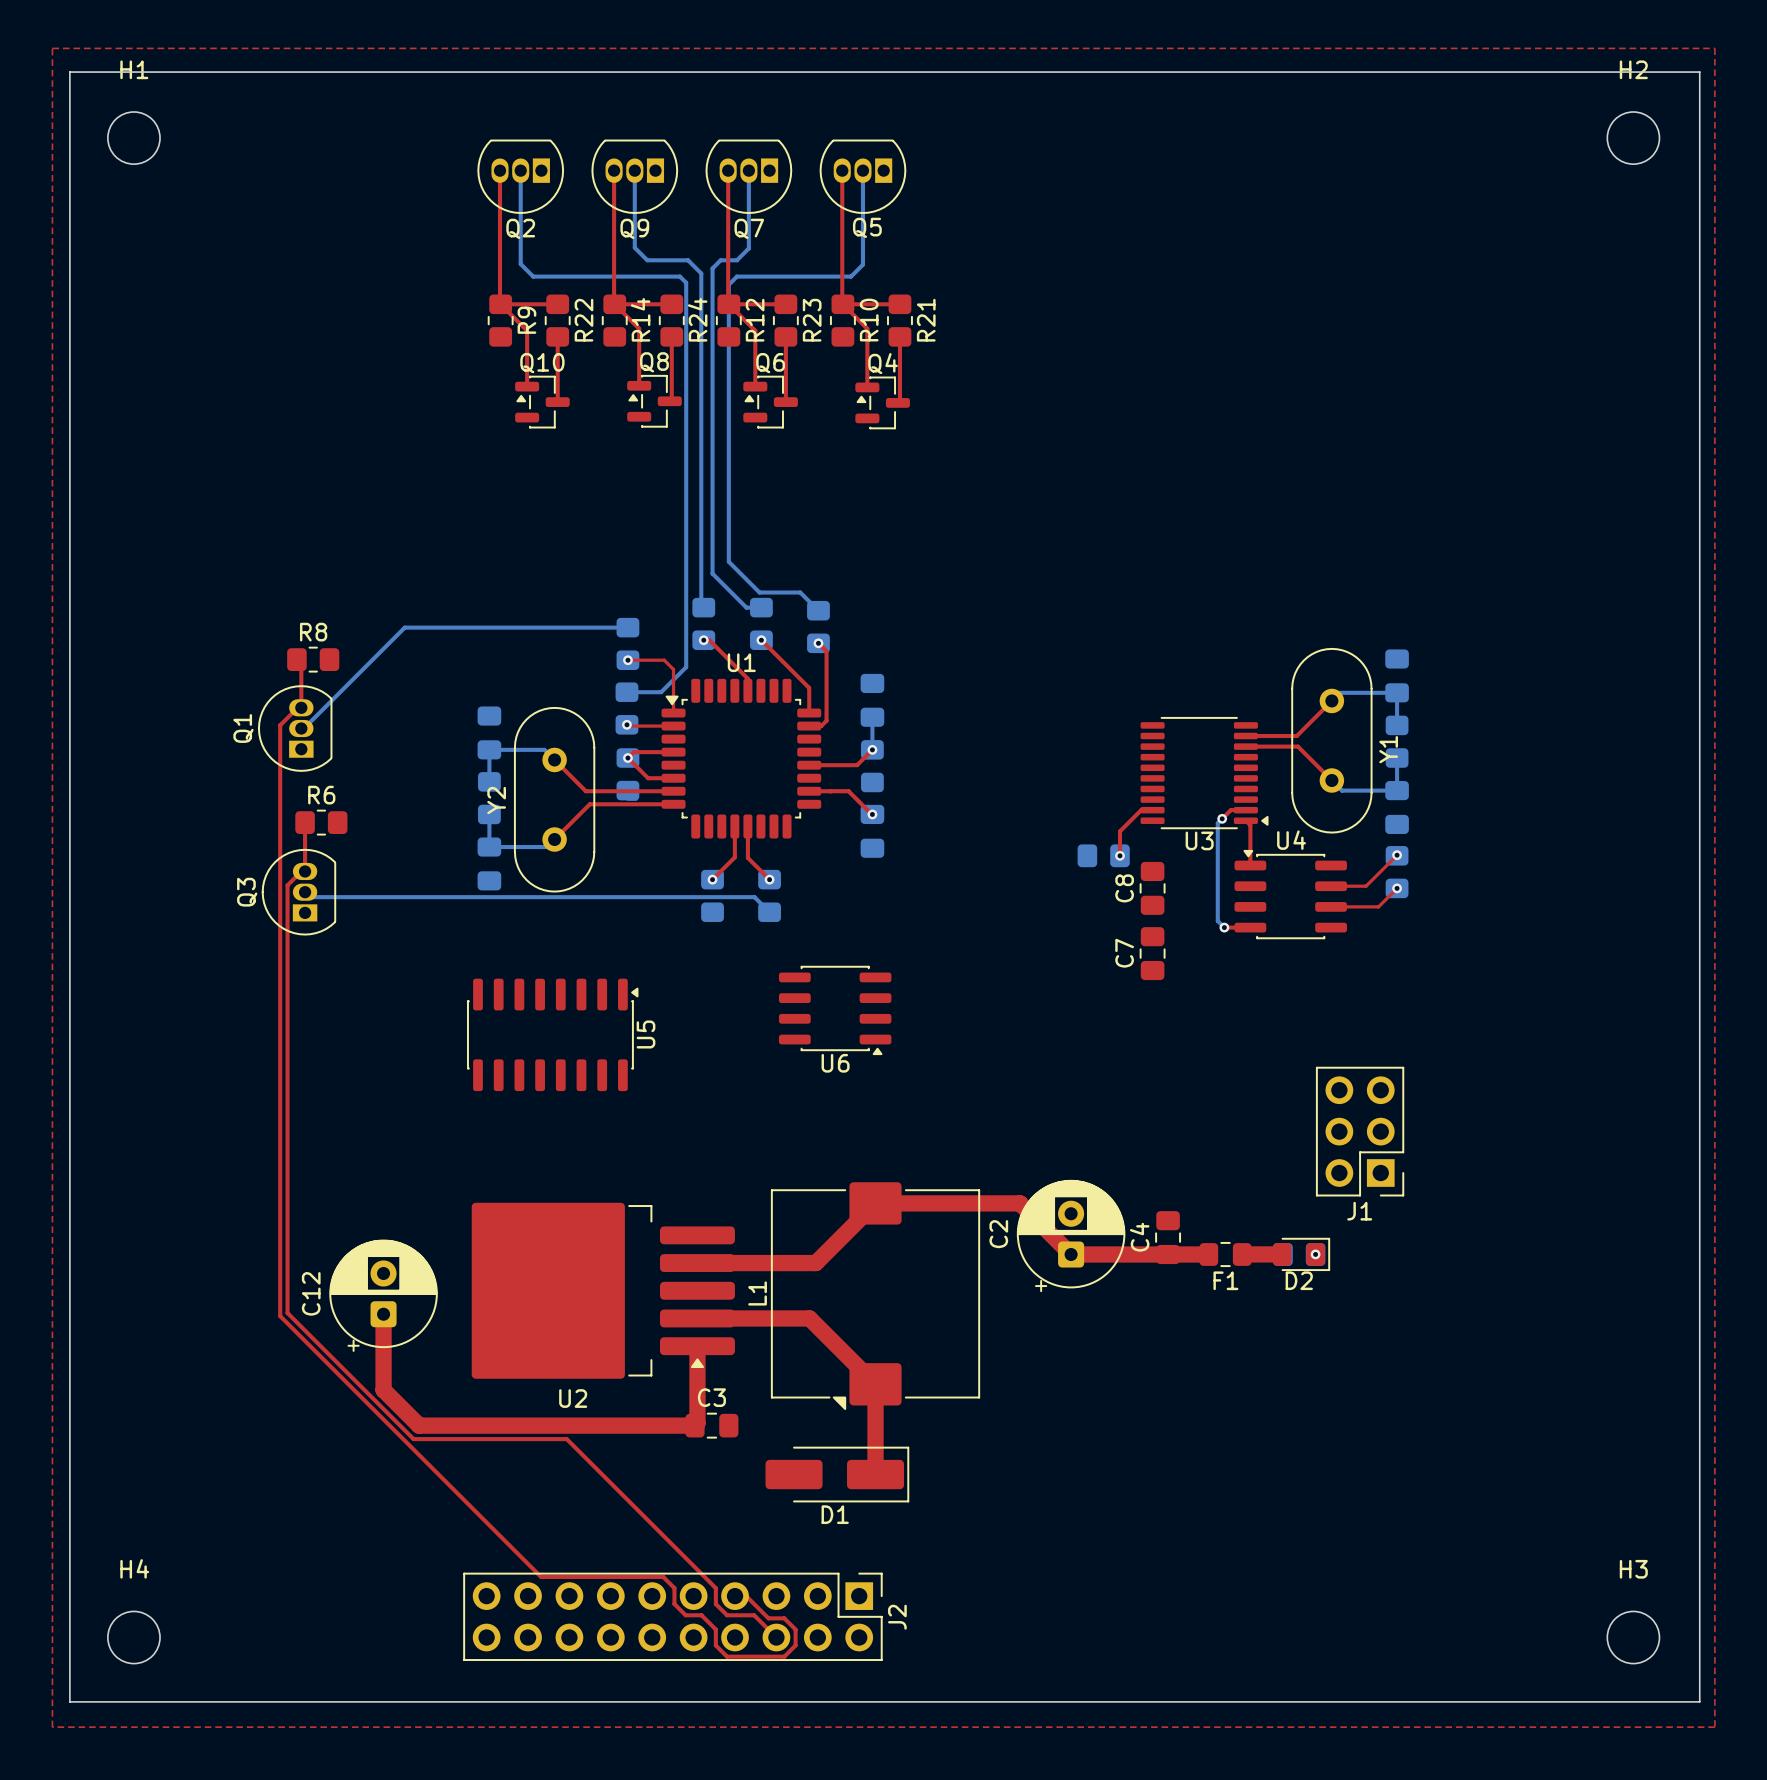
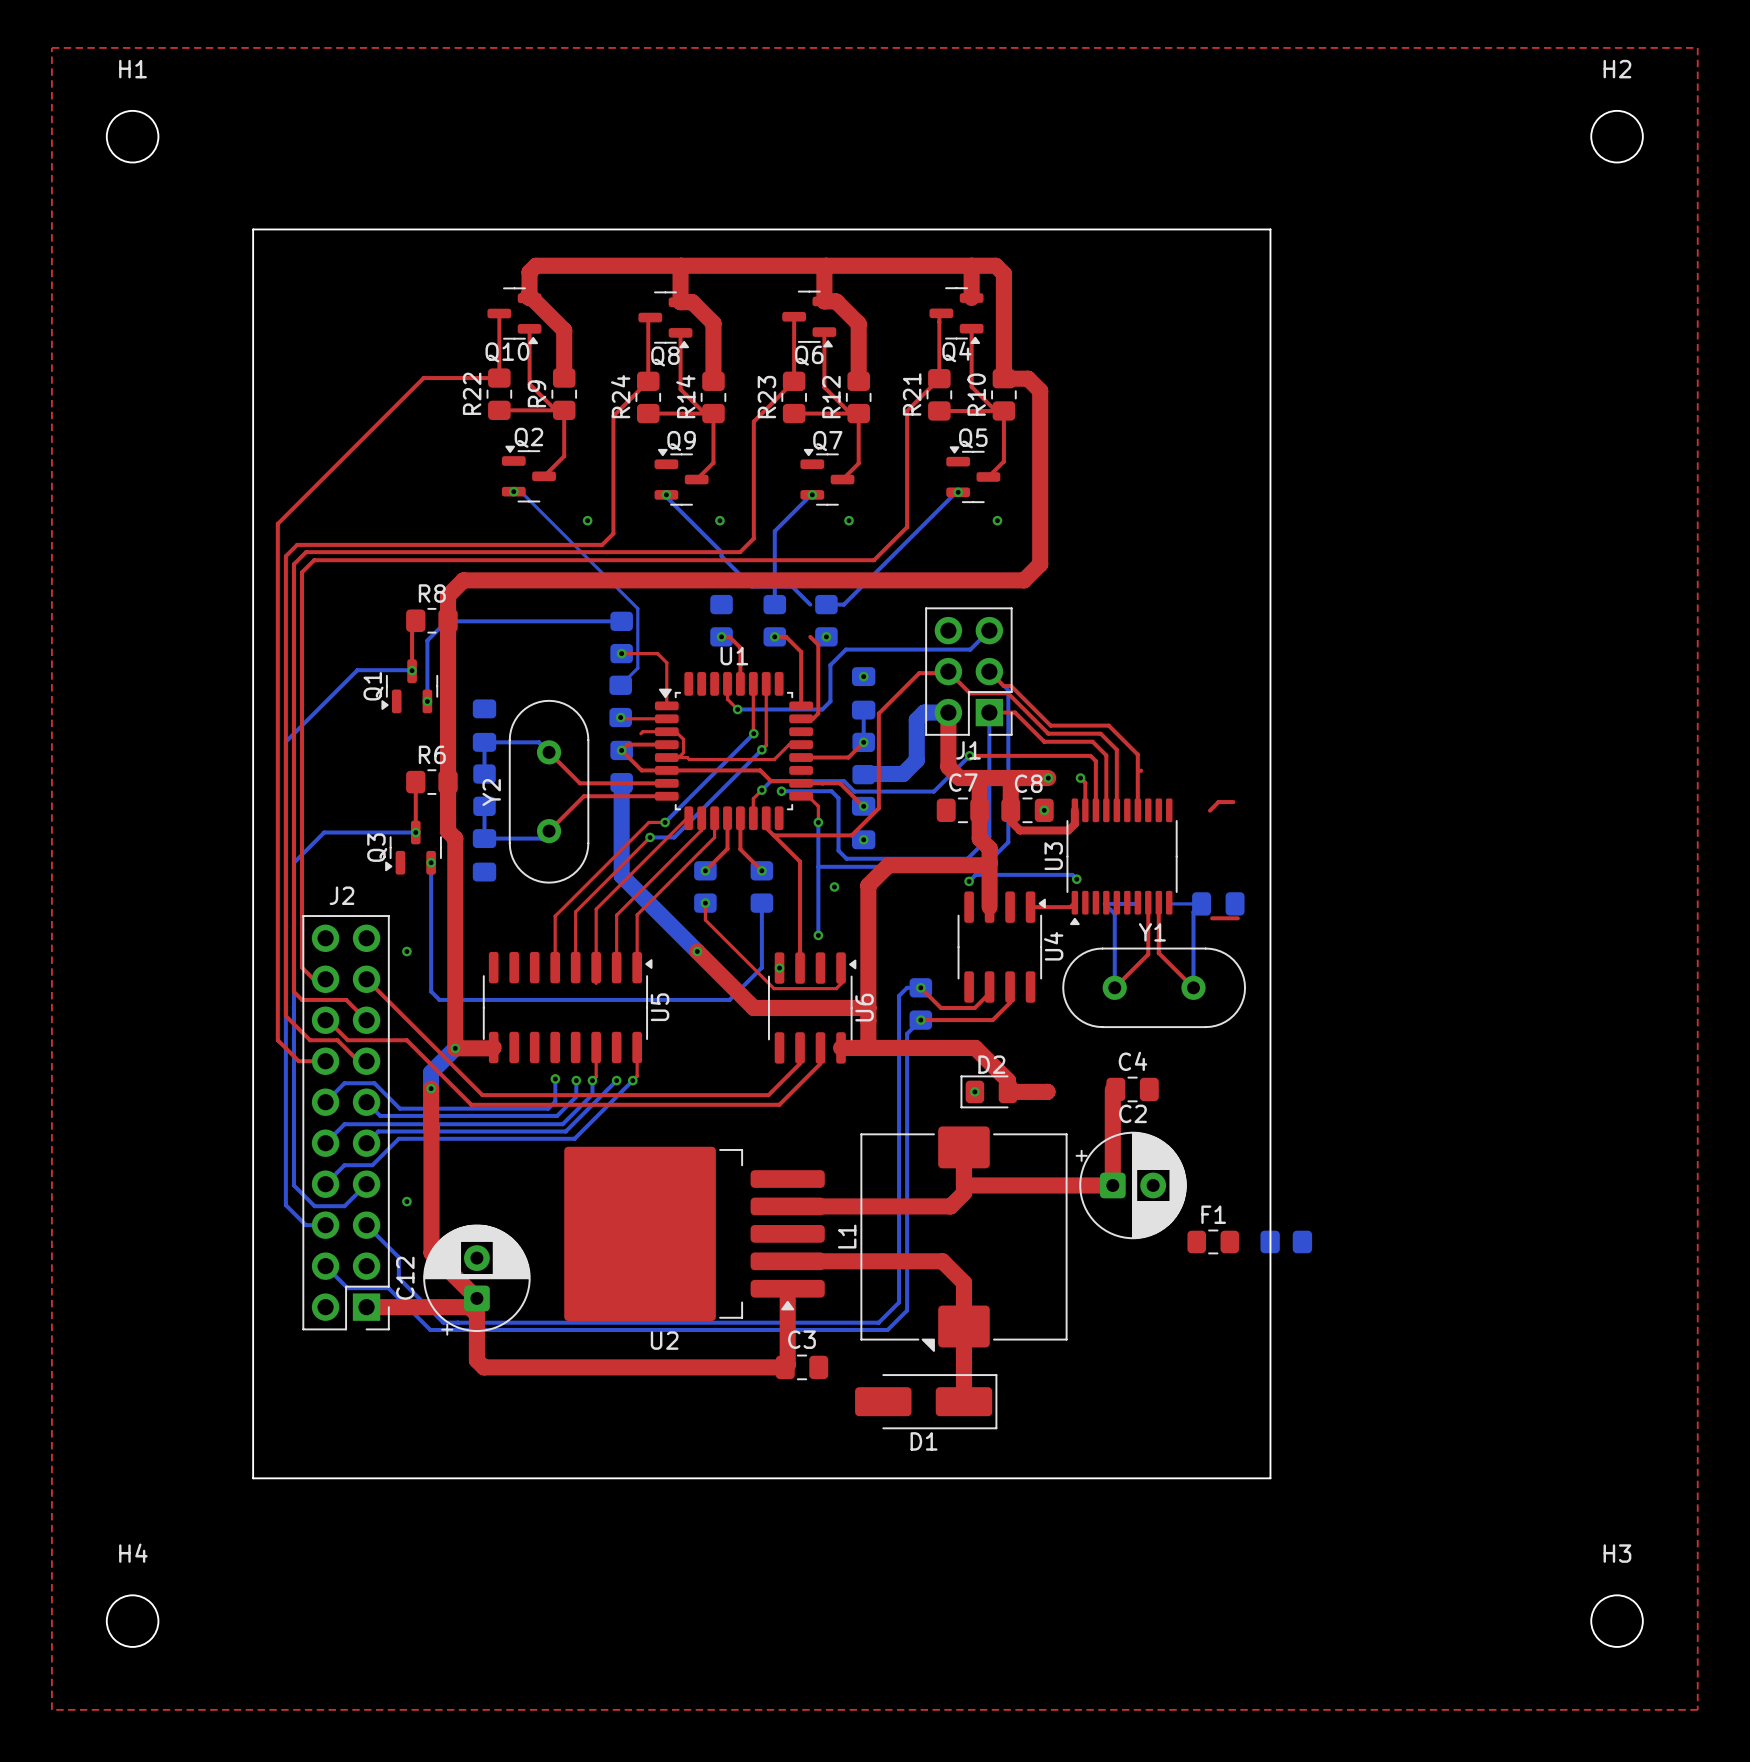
board edge: (69, 72) (1699, 72) (1699, 1701) (69, 1701) (69, 72) -> none
Q2 footprint: [477, 139, 565, 215] -> [501, 445, 556, 503]
Q9 footprint: [591, 139, 679, 215] -> [654, 448, 709, 506]
Q7 footprint: [705, 139, 793, 215] -> [800, 448, 855, 506]
Q5 footprint: [819, 139, 907, 215] -> [946, 446, 1001, 504]
top track: (500, 170) (500, 303) (527, 330) (527, 386) -> none
bottom track: (520, 170) (520, 264) (533, 276) (679, 276) (686, 282) (686, 667) (661, 692) (626, 692) -> (513, 491) (520, 491) (637, 608) (637, 668) (620, 685)
top track: (614, 170) (614, 303) (639, 328) (639, 385) -> none
bottom track: (634, 170) (634, 247) (647, 260) (688, 260) (701, 273) (701, 605) (703, 607) -> none
top track: (728, 170) (728, 303) (755, 330) (755, 386) -> none
bottom track: (748, 170) (748, 248) (736, 260) (720, 260) (712, 268) (712, 573) (746, 607) (761, 607) -> none
top track: (842, 170) (842, 303) (867, 328) -> (826, 265) (824, 267) (824, 301) (836, 301) (858, 325)
bottom track: (862, 170) (862, 264) (851, 276) (736, 276) (728, 284) (728, 557) -> (665, 495) (721, 552)
Q5 name position: Q5 (867, 227) -> Q5 (973, 438)
Q2 name position: Q2 (520, 228) -> Q2 (528, 437)
Q9 name position: Q9 (634, 228) -> Q9 (681, 440)
Q7 name position: Q7 (749, 228) -> Q7 (827, 440)
board edge: none -> (253, 229) (1270, 229) (1270, 1478) (253, 1478) (253, 229)
top track: none -> (681, 265) (680, 302) (692, 302) (713, 323) (713, 381)
top track: none -> (971, 265) (971, 298)
top track: (500, 304) (557, 304) -> (499, 410) (555, 410)
top track: (614, 304) (671, 304) -> none
top track: (728, 304) (785, 304) -> none
top track: (842, 304) (899, 304) -> (939, 410) (995, 410)
top track: none -> (499, 313) (499, 378) (423, 378) (277, 523) (277, 1040) (298, 1061) (325, 1061)
top track: none -> (941, 313) (939, 315) (939, 378) (907, 410) (907, 527) (874, 560) (314, 560) (302, 572) (302, 814)
R14 name position: R14 (640, 319) -> R14 (685, 396)
R24 name position: R24 (697, 319) -> R24 (620, 396)
top track: none -> (794, 316) (794, 381) (753, 421) (753, 538) (740, 552) (306, 552) (293, 564) (293, 991) (302, 999) (346, 999) (366, 1020)
R9 position: (500, 320) -> (564, 394)
R9 name position: R9 (526, 320) -> R9 (536, 393)
R22 position: (557, 320) -> (499, 394)
R22 name position: R22 (583, 320) -> R22 (472, 393)
R14 position: (614, 320) -> (713, 397)
top track: none -> (650, 317) (648, 319) (648, 381) (613, 416) (613, 533) (602, 544) (297, 544) (285, 556) (285, 1016) (310, 1040) (337, 1040) (358, 1061)
R24 position: (671, 320) -> (648, 397)
R12 position: (728, 320) -> (858, 397)
R12 name position: R12 (755, 320) -> R12 (831, 397)
R23 position: (785, 320) -> (794, 397)
R23 name position: R23 (812, 320) -> R23 (766, 397)
R10 position: (842, 320) -> (1003, 394)
R10 name position: R10 (869, 320) -> R10 (976, 394)
R21 position: (899, 320) -> (939, 394)
R21 name position: R21 (926, 320) -> R21 (912, 394)
top track width: thin (867, 328) (867, 385) -> thick (858, 325) (858, 381)
top track: none -> (529, 328) (529, 384) (556, 410)
top track: none -> (971, 328) (971, 386) (996, 411)
top track: none -> (824, 332) (824, 387) (850, 413) (794, 413)
top track: (557, 336) (557, 402) -> none
top track: (671, 336) (671, 399) (669, 401) -> none
top track: none -> (680, 332) (680, 389) (704, 413) (648, 413)
top track: (785, 336) (785, 402) -> none
top track: (899, 336) (899, 400) (897, 402) -> none
Q8 name position: Q8 (654, 362) -> Q8 (665, 356)
Q10 name position: Q10 (542, 363) -> Q10 (507, 352)
Q6 name position: Q6 (770, 363) -> Q6 (809, 355)
Q4 name position: Q4 (883, 363) -> Q4 (956, 351)
Q8 footprint: [627, 374, 682, 428] -> [638, 291, 693, 349]
Q10 footprint: [515, 375, 570, 429] -> [487, 287, 542, 345]
Q6 footprint: [743, 375, 798, 429] -> [782, 290, 837, 348]
Q4 footprint: [855, 376, 910, 430] -> [929, 287, 984, 345]
top track: none -> (564, 378) (564, 330) (532, 298) (527, 296) (529, 294) (529, 272) (535, 265) (995, 265) (1003, 273) (1003, 378) (1028, 378) (1040, 390) (1040, 564) (1024, 580) (463, 580) (448, 595) (448, 831) (455, 838) (455, 1048) (493, 1047)
top track: none -> (564, 410) (564, 456) (544, 476)
top track: none -> (1003, 410) (1003, 461) (988, 476)
top track: none -> (713, 413) (713, 462) (696, 479)
top track: none -> (858, 413) (858, 463) (842, 479)
via: none -> (513, 491)
bottom track: none -> (958, 492) (843, 604) (826, 604)
via: none -> (958, 492)
via: none -> (666, 494)
via: none -> (812, 494)
bottom track: none -> (810, 495) (774, 531) (774, 604)
via: none -> (587, 520)
via: none -> (719, 520)
via: none -> (849, 520)
via: none -> (997, 520)
part: (703, 623) -> none
part: (761, 623) -> none
top track: none -> (415, 620) (412, 624) (412, 676)
bottom track: (451, 627) (404, 627) (303, 728) (301, 728) -> (446, 621) (427, 640) (427, 701)
part: none -> (721, 620)
part: none -> (774, 620)
part position: (818, 627) -> (826, 620)
bottom track: none -> (989, 630) (970, 649) (845, 649) (830, 665) (830, 701) (822, 709) (737, 709)
top track: (703, 640) (709, 640) (747, 678) -> (721, 636) (729, 636) (740, 647) (740, 672)
via: (703, 640) -> none
top track: (761, 640) (809, 688) -> (774, 636) (786, 636) (801, 651) (801, 681)
via: (761, 640) -> none
via: none -> (721, 636)
via: none -> (774, 636)
via position: (818, 643) -> (826, 636)
top track: (296, 659) (301, 664) (301, 707) (297, 707) (280, 725) (280, 1316) (541, 1576) (663, 1576) (674, 1588) (674, 1604) (685, 1615) (701, 1615) (715, 1629) (715, 1645) (727, 1656) (784, 1656) (795, 1645) (795, 1629) (784, 1618) (768, 1618) (746, 1596) (735, 1596) -> none
R8 position: (313, 659) -> (431, 620)
part: (1397, 675) -> none
bottom track: none -> (411, 670) (357, 670) (285, 741) (285, 1205) (305, 1225) (325, 1225)
via: none -> (412, 670)
top track: none -> (989, 671) (1003, 686) (1011, 686) (1050, 725) (1108, 725) (1137, 754) (1136, 809)
bottom track: none -> (989, 671) (1008, 690) (1008, 842) (983, 866) (818, 866)
via: none -> (863, 676)
Q1 footprint: [257, 685, 333, 772] -> [381, 659, 439, 714]
top track: none -> (727, 683) (727, 699) (737, 709)
top track: none -> (753, 683) (753, 733)
top track: none -> (766, 683) (766, 745) (761, 749)
top track: (1331, 700) (1296, 736) (1245, 736) -> none
bottom track: (1331, 700) (1340, 692) (1397, 692) (1397, 725) -> none
via: none -> (427, 701)
via: none -> (737, 709)
U3 footprint: [1140, 716, 1269, 830] -> [1066, 798, 1178, 926]
top track: none -> (948, 712) (948, 766) (959, 778) (1048, 778)
bottom track: none -> (948, 712) (924, 712) (916, 719) (916, 760) (903, 774) (863, 774)
top track: none -> (989, 712) (1015, 712) (1044, 741) (1092, 741) (1106, 755) (1106, 810)
bottom track: none -> (989, 712) (989, 836) (967, 858) (846, 858) (838, 850) (838, 798) (831, 791) (781, 791)
Y1 rotation: 0° (1331, 740) -> 90° clockwise (1154, 987)
Y1 position: (1331, 740) -> (1154, 987)
top track: none -> (640, 733) (642, 731) (675, 731) (683, 739) (683, 752) (678, 757)
bottom track: none -> (753, 733) (665, 822)
via: none -> (753, 733)
part: (1397, 741) -> none
top track: (1245, 746) (1297, 746) (1331, 780) -> none
Y1 name position: Y1 (1388, 749) -> Y1 (1152, 932)
top track: none -> (801, 744) (789, 744) (774, 759) (689, 759) (687, 757) (666, 757)
bottom track: none -> (761, 749) (674, 837) (650, 837) (655, 837)
via: none -> (761, 749)
bottom track: (1397, 758) (1397, 790) (1341, 790) (1331, 780) -> none
top track: none -> (969, 755) (1090, 755) (1095, 761) (1095, 810)
bottom track: none -> (969, 755) (933, 791) (854, 791) (844, 781) (770, 781) (761, 790)
via: none -> (969, 755)
top track: none -> (666, 770) (760, 770) (770, 781) (798, 781) (801, 783)
top track: none -> (979, 778) (979, 838) (989, 848) (989, 907)
top track: none -> (1011, 778) (1010, 821) (1020, 830) (1068, 830) (1074, 824) (1074, 810)
via: none -> (1048, 778)
top track: none -> (1080, 778) (1085, 782) (1085, 810)
via: none -> (1080, 778)
top track: none -> (415, 782) (415, 832)
bottom track: none -> (621, 782) (621, 875) (697, 951)
top track: none -> (761, 790) (753, 798) (753, 818)
via: none -> (761, 790)
via: none -> (781, 791)
top track: none -> (801, 796) (808, 796) (818, 806) (818, 822)
part: (1397, 807) -> none
top track: (1152, 810) (1141, 810) (1120, 831) (1120, 855) -> none
via: none -> (1044, 810)
top track: none -> (1116, 810) (1116, 749) (1100, 733) (1048, 733) (1008, 693) (970, 693) (948, 671) (946, 673) (919, 673) (878, 713) (878, 808) (851, 835) (773, 835)
bottom track: (1222, 818) (1217, 823) (1217, 920) (1224, 927) -> none
via: (1222, 818) -> none
top track: (1245, 820) (1250, 825) (1250, 865) -> none
R6 position: (321, 822) -> (431, 782)
top track: none -> (688, 818) (596, 909) (596, 983)
top track: none -> (701, 818) (701, 830) (616, 915) (616, 967)
top track: none -> (714, 818) (714, 837) (637, 914) (637, 967)
top track: none -> (766, 818) (766, 827) (800, 861) (800, 968)
top track: none -> (665, 822) (648, 822) (555, 916) (555, 967)
via: none -> (665, 822)
bottom track: none -> (818, 822) (818, 935)
via: none -> (818, 822)
bottom track: none -> (415, 832) (324, 832) (293, 862) (293, 1185) (314, 1206) (344, 1206) (366, 1184)
via: none -> (415, 832)
U3 name position: U3 (1199, 840) -> U3 (1053, 856)
U4 name position: U4 (1291, 840) -> U4 (1053, 946)
top track: none -> (650, 837) (575, 911) (575, 967)
via: none -> (650, 837)
Q3 footprint: [261, 848, 337, 936] -> [385, 820, 442, 875]
via: none -> (863, 839)
U4 footprint: [1234, 849, 1347, 940] -> [957, 891, 1046, 1003]
part: (1103, 855) -> none
via: (1120, 855) -> none
top track: (1397, 855) (1366, 886) (1331, 886) -> none
via: (1397, 855) -> none
top track: (305, 871) (301, 871) (287, 885) (287, 1313) (413, 1439) (566, 1439) (715, 1588) (715, 1604) (727, 1615) (754, 1615) (776, 1637) -> (302, 862) (302, 967) (313, 979) (325, 979)
via: none -> (431, 862)
top track: none -> (989, 862) (987, 865) (888, 865) (868, 885) (868, 1047)
part: (1397, 872) -> none
bottom track: none -> (1076, 879) (1072, 874) (975, 874) (969, 881)
via: none -> (1076, 879)
C8 rotation: 0° (1152, 888) -> 90° clockwise (1027, 810)
C8 position: (1152, 888) -> (1027, 810)
top track: (1397, 888) (1378, 906) (1331, 906) -> none
via: (1397, 888) -> none
via: none -> (969, 881)
bottom track: (305, 892) (310, 897) (754, 897) (769, 912) -> (431, 862) (431, 991) (439, 999) (729, 999) (761, 967) (761, 903)
via: none -> (834, 886)
top track: none -> (1074, 902) (1070, 907) (1030, 907)
top track: none -> (1148, 902) (1148, 954) (1114, 987)
top track: none -> (1158, 902) (1158, 953) (1193, 987)
top track: none -> (705, 903) (705, 920) (774, 988) (836, 988) (841, 983) (841, 968)
via: none -> (705, 903)
bottom track: none -> (1136, 903) (1104, 903) (1114, 913) (1114, 987)
bottom track: none -> (1169, 903) (1201, 903) (1193, 911) (1193, 987)
part: none -> (1218, 903)
via: (1224, 927) -> none
via: none -> (818, 935)
C7 rotation: 0° (1152, 953) -> 90° clockwise (962, 810)
C7 position: (1152, 953) -> (962, 810)
via: none -> (406, 951)
top track: none -> (697, 951) (753, 1007) (868, 1007)
via: none -> (697, 951)
U6 footprint: [778, 965, 892, 1056] -> [768, 952, 857, 1064]
via: none -> (779, 968)
U5 footprint: [467, 978, 639, 1092] -> [482, 951, 653, 1064]
top track: none -> (366, 979) (482, 1095) (768, 1095) (800, 1063) (800, 1047)
top track: none -> (1010, 987) (1010, 1002) (992, 1020) (920, 1020)
top track: none -> (920, 987) (941, 1008) (974, 1008) (989, 993) (989, 987) (989, 996)
bottom track: none -> (920, 987) (907, 987) (899, 995) (899, 1302) (878, 1322) (443, 1322) (398, 1278) (398, 1257) (366, 1225)
via: none -> (920, 987)
part: none -> (920, 1003)
top track: none -> (327, 1020) (347, 1040) (406, 1040) (471, 1104) (779, 1104) (820, 1063) (820, 1047)
bottom track: none -> (920, 1020) (907, 1033) (907, 1310) (887, 1329) (430, 1329) (388, 1288) (347, 1288) (325, 1266)
via: none -> (920, 1020)
bottom track: none -> (455, 1048) (431, 1072) (431, 1088)
via: none -> (455, 1048)
top track: none -> (596, 1047) (596, 1076) (592, 1080)
top track: none -> (637, 1047) (637, 1076) (632, 1080)
top track: none -> (841, 1047) (975, 1047) (1007, 1080) (1007, 1091) (1047, 1091)
U6 name position: U6 (835, 1063) -> U6 (864, 1007)
bottom track: none -> (555, 1078) (555, 1101) (548, 1108) (399, 1108) (374, 1083) (344, 1083) (325, 1102)
via: none -> (555, 1078)
bottom track: none -> (576, 1080) (576, 1096) (557, 1115) (380, 1115) (366, 1102)
via: none -> (576, 1080)
bottom track: none -> (592, 1080) (592, 1094) (562, 1124) (344, 1124) (325, 1143)
via: none -> (592, 1080)
bottom track: none -> (616, 1080) (565, 1131) (378, 1131) (366, 1143)
via: none -> (616, 1080)
bottom track: none -> (632, 1080) (574, 1138) (398, 1138) (372, 1165) (344, 1165) (325, 1184)
via: none -> (632, 1080)
top track: none -> (431, 1088) (431, 1253) (476, 1298) (476, 1360) (483, 1367) (785, 1367) (787, 1364) (787, 1288)
via: none -> (431, 1088)
top track: none -> (1112, 1089) (1112, 1185) (963, 1185)
via: none -> (974, 1091)
J1 position: (1360, 1131) -> (968, 671)
top track: none -> (963, 1147) (963, 1193) (950, 1206) (787, 1206)
via: none -> (406, 1201)
C2 rotation: 0° (1071, 1236) -> 90° clockwise (1131, 1185)
C2 position: (1071, 1236) -> (1131, 1185)
C4 rotation: 0° (1168, 1237) -> 90° clockwise (1132, 1089)
C4 position: (1168, 1237) -> (1132, 1089)
top track: (1208, 1254) (1071, 1254) (1020, 1203) (875, 1203) (815, 1263) (697, 1263) -> none
top track: (1242, 1254) (1282, 1254) -> none
D2 rotation: 0° (1301, 1254) -> 180° (988, 1091)
D2 position: (1301, 1254) -> (988, 1091)
via: (1315, 1254) -> none
top track: none -> (787, 1261) (942, 1261) (963, 1282) (963, 1401)
F1 name position: F1 (1225, 1280) -> F1 (1213, 1214)
U2 position: (603, 1290) -> (694, 1233)
C12 position: (383, 1295) -> (476, 1280)
L1 position: (875, 1296) -> (963, 1239)
top track: (383, 1314) (383, 1390) (419, 1425) (695, 1425) (697, 1423) (697, 1346) -> none
top track: (697, 1318) (809, 1318) (875, 1384) (875, 1474) -> none
top track: none -> (366, 1307) (469, 1307) (476, 1314)
C3 position: (711, 1425) -> (802, 1367)
D1 position: (837, 1474) -> (926, 1401)
J2 rotation: 0° (672, 1616) -> 90° clockwise (346, 1122)
J2 position: (672, 1616) -> (346, 1122)
J2 name position: J2 (897, 1617) -> J2 (341, 895)

